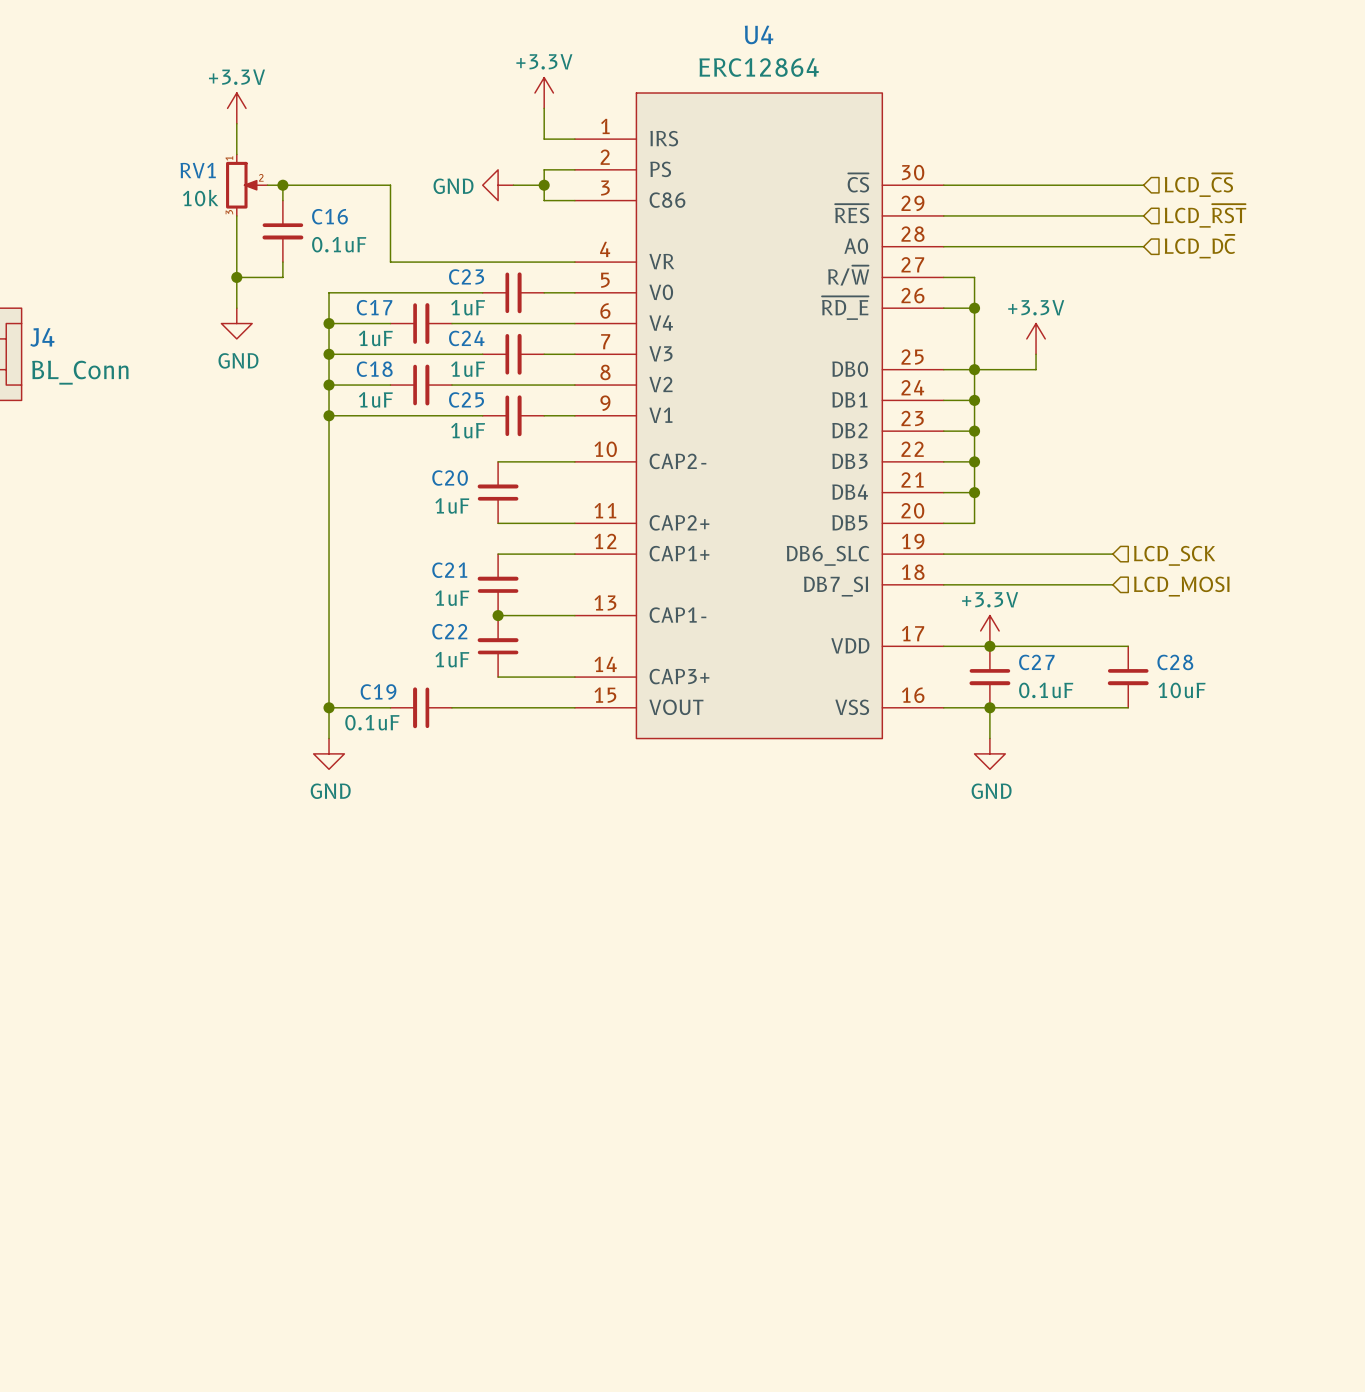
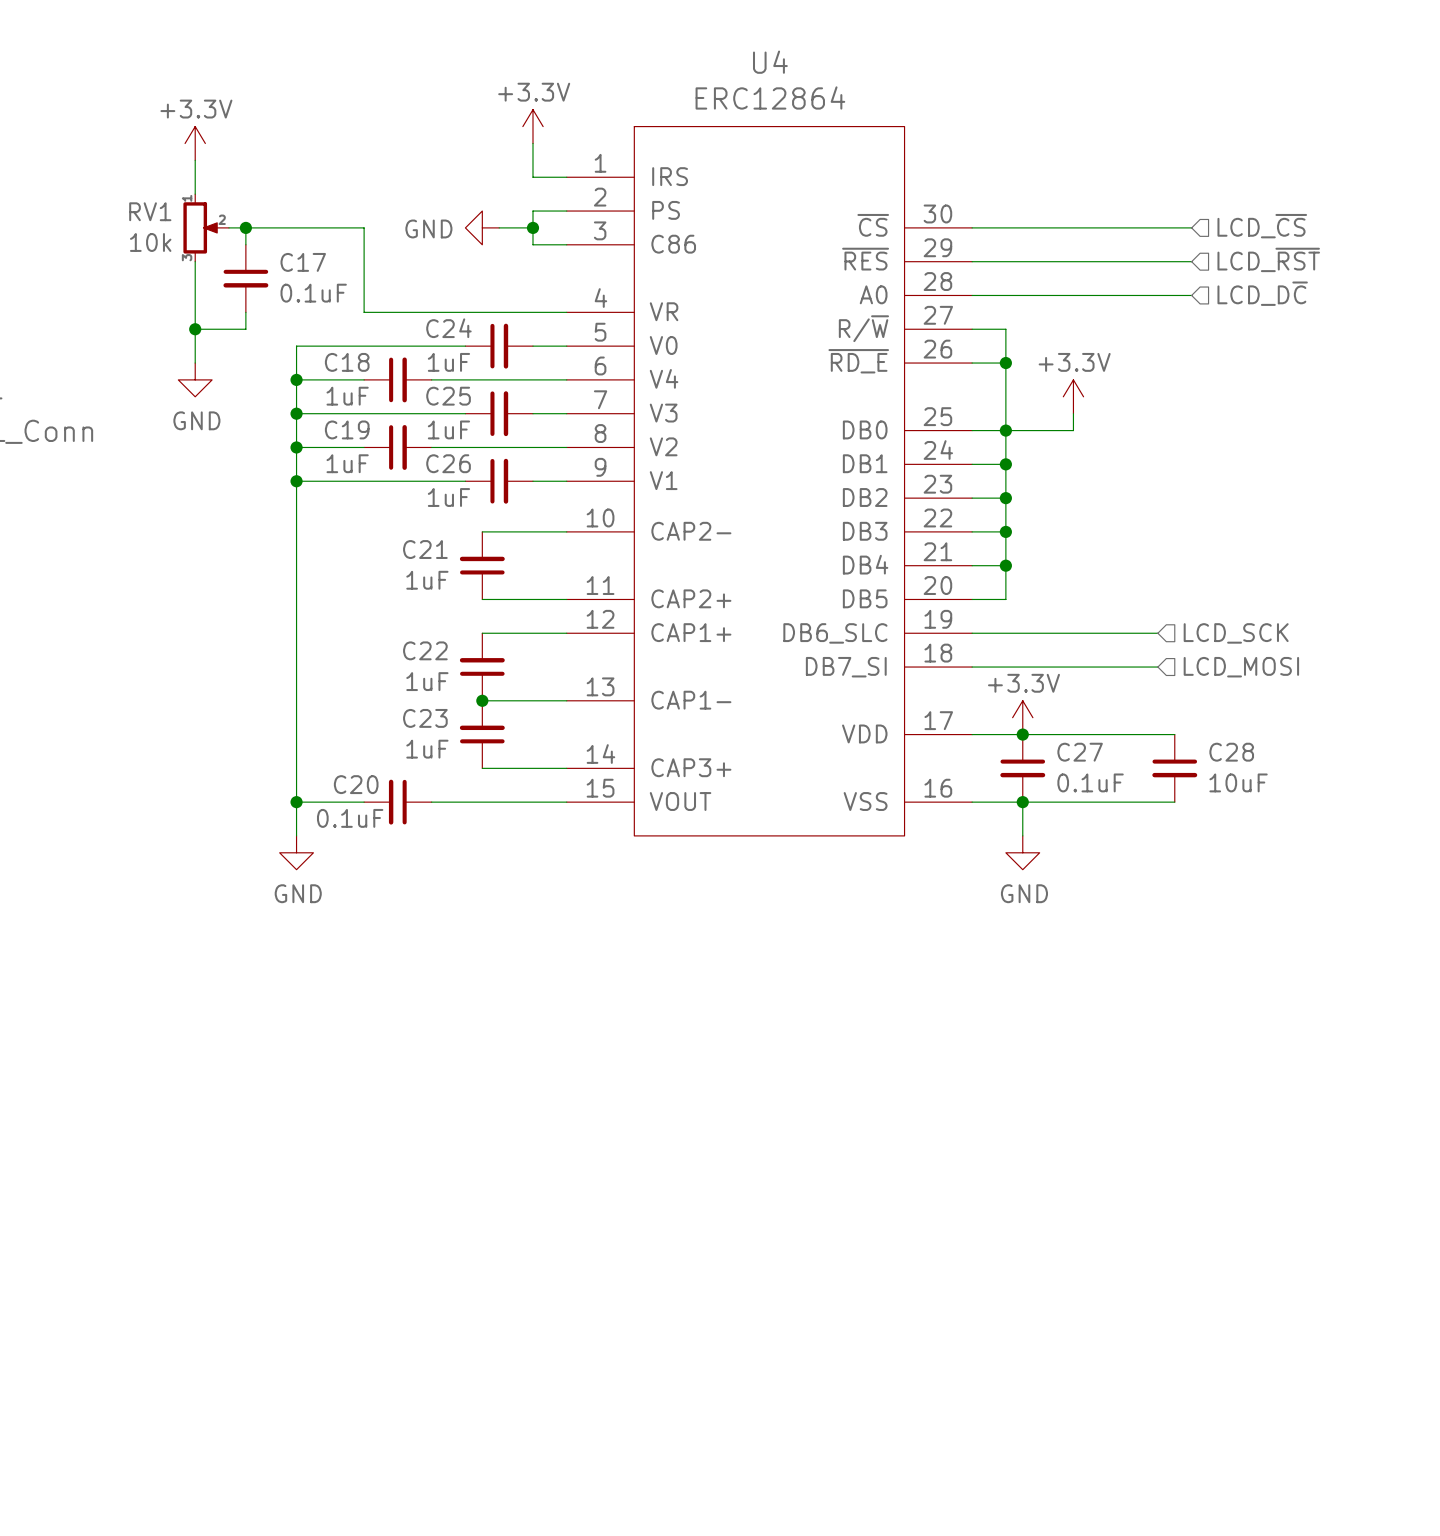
C16 name: C16 (329, 216) -> C17 (303, 262)
C23 name: C23 (466, 276) -> C24 (448, 328)
C17 name: C17 (374, 307) -> C18 (347, 362)
C24 name: C24 (466, 338) -> C25 (448, 396)
C18 name: C18 (374, 369) -> C19 (347, 429)
C25 name: C25 (466, 399) -> C26 (448, 463)
C20 name: C20 (450, 478) -> C21 (425, 549)
C21 name: C21 (449, 570) -> C22 (425, 650)
C22 name: C22 (449, 631) -> C23 (425, 718)
C19 name: C19 (378, 691) -> C20 (356, 784)

